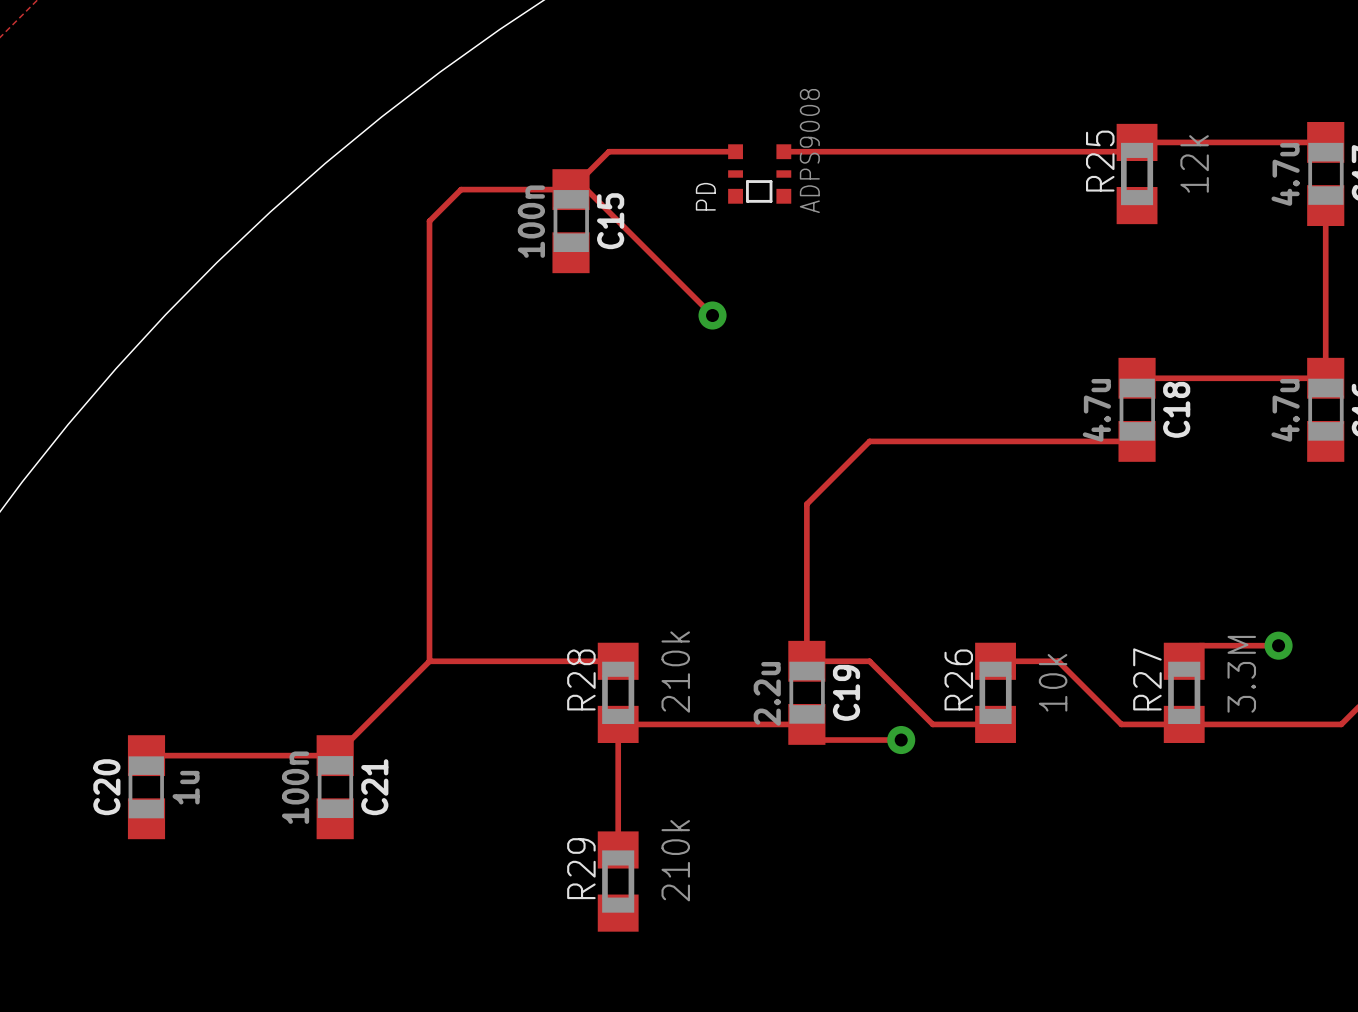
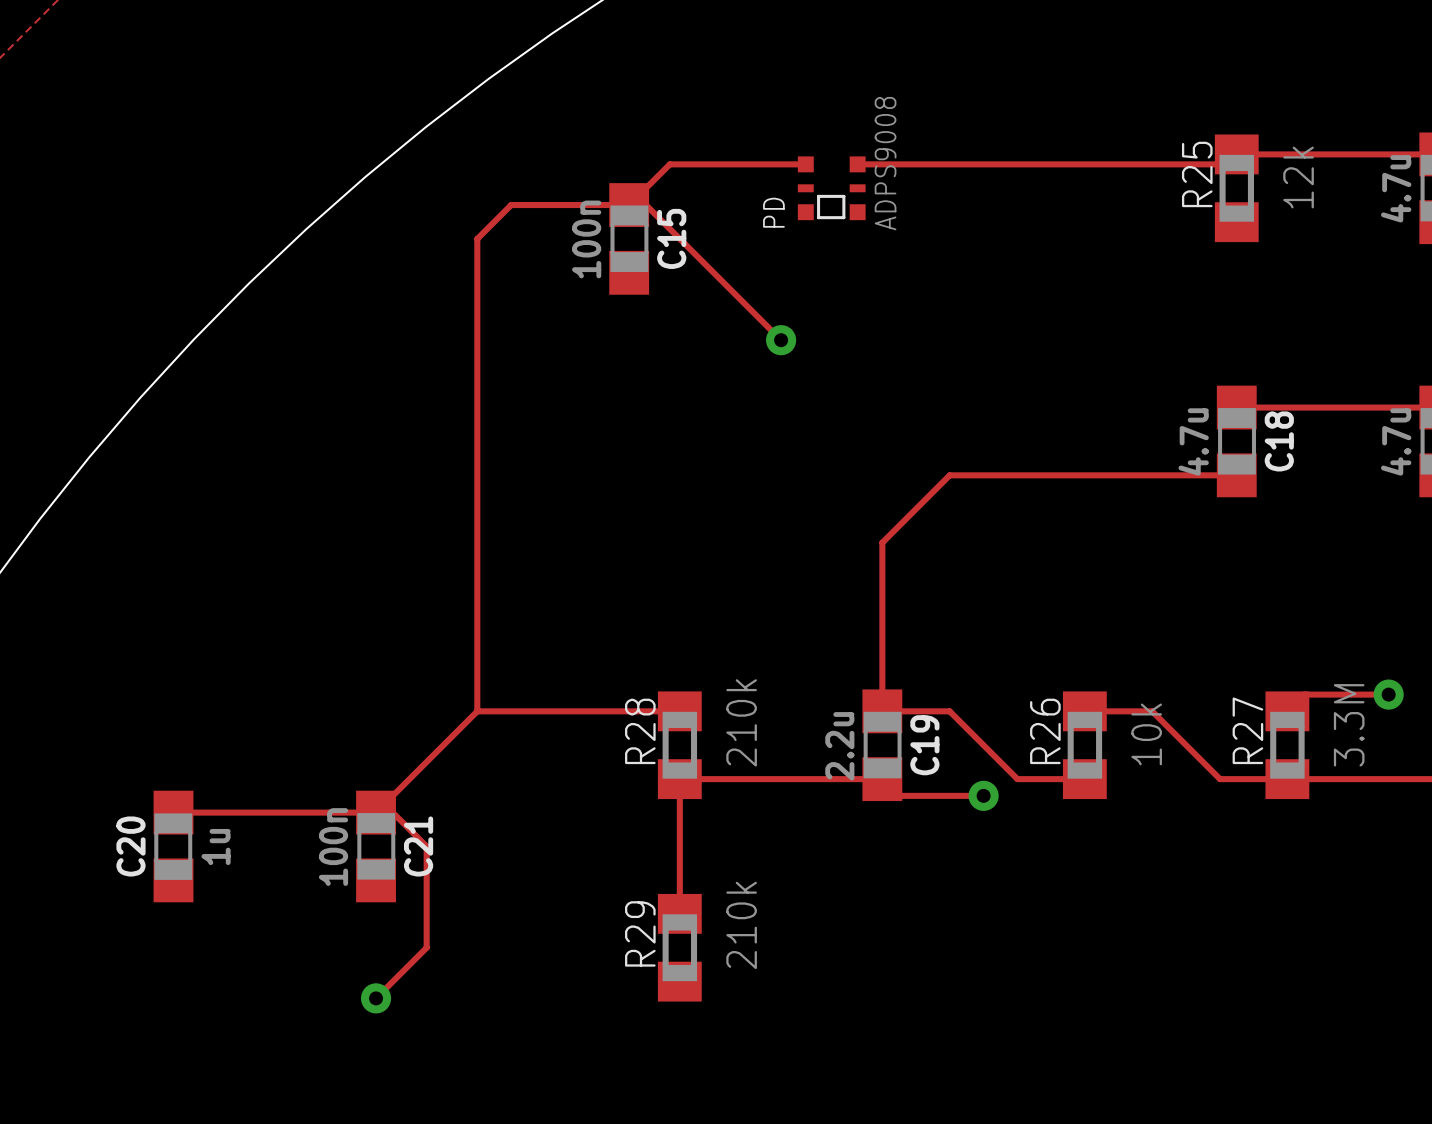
track: none -> (384, 804) (426, 846) (426, 947) (376, 998)
via: none -> (376, 998)

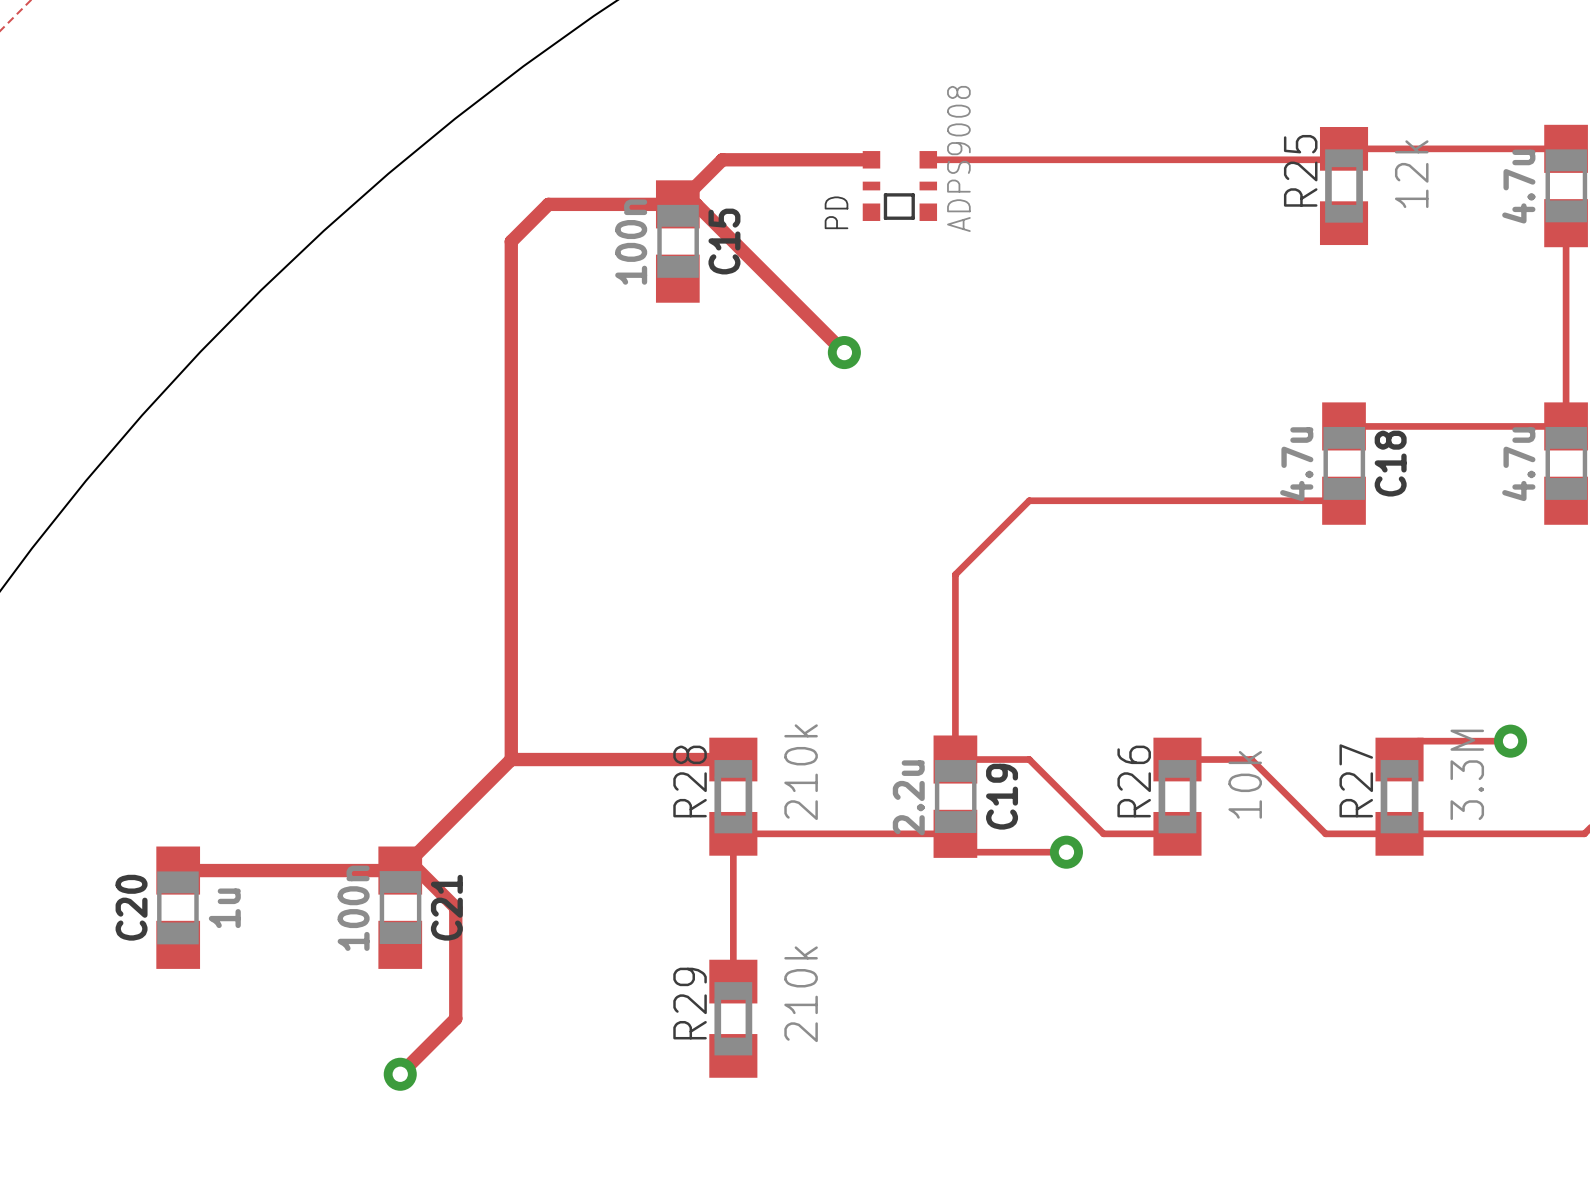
track width: thin (805, 164) (669, 164) (629, 205) -> thick (871, 159) (722, 159) (677, 204)
track width: thin (781, 340) (645, 205) (511, 205) (477, 238) (477, 711) -> thick (844, 352) (696, 204) (548, 204) (511, 241) (511, 759)
track width: thin (477, 711) (376, 812) (173, 812) -> thick (511, 759) (400, 870) (178, 870)
track width: thin (477, 711) (679, 711) -> thick (511, 759) (733, 759)
track width: thin (384, 804) (426, 846) (426, 947) (376, 998) -> thick (409, 861) (455, 907) (455, 1018) (400, 1074)

